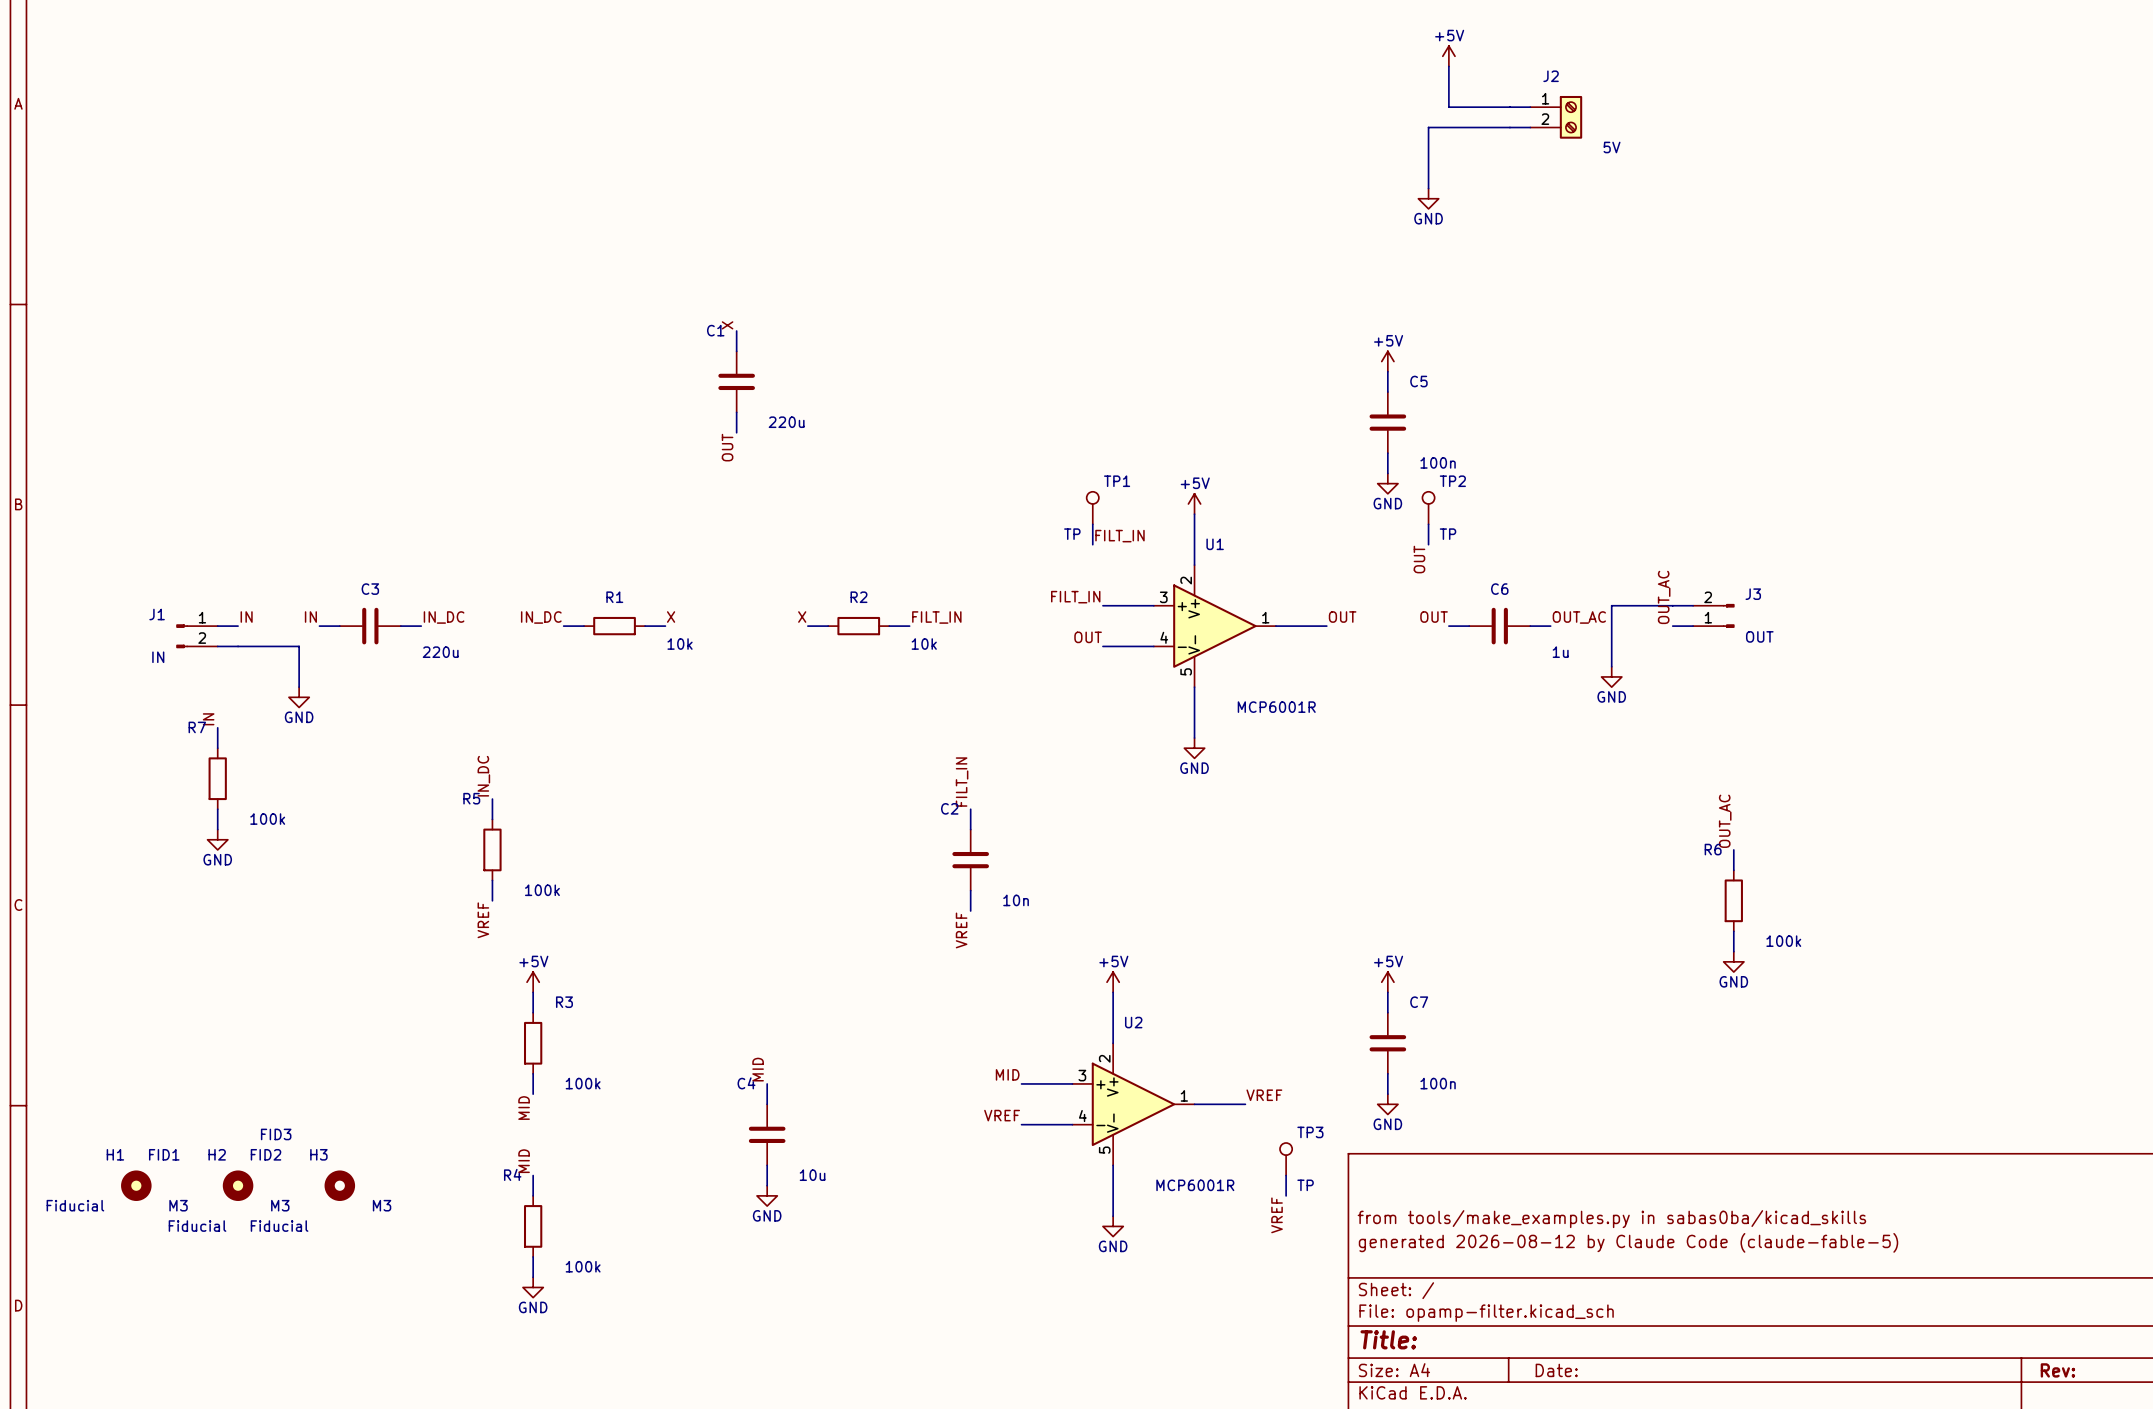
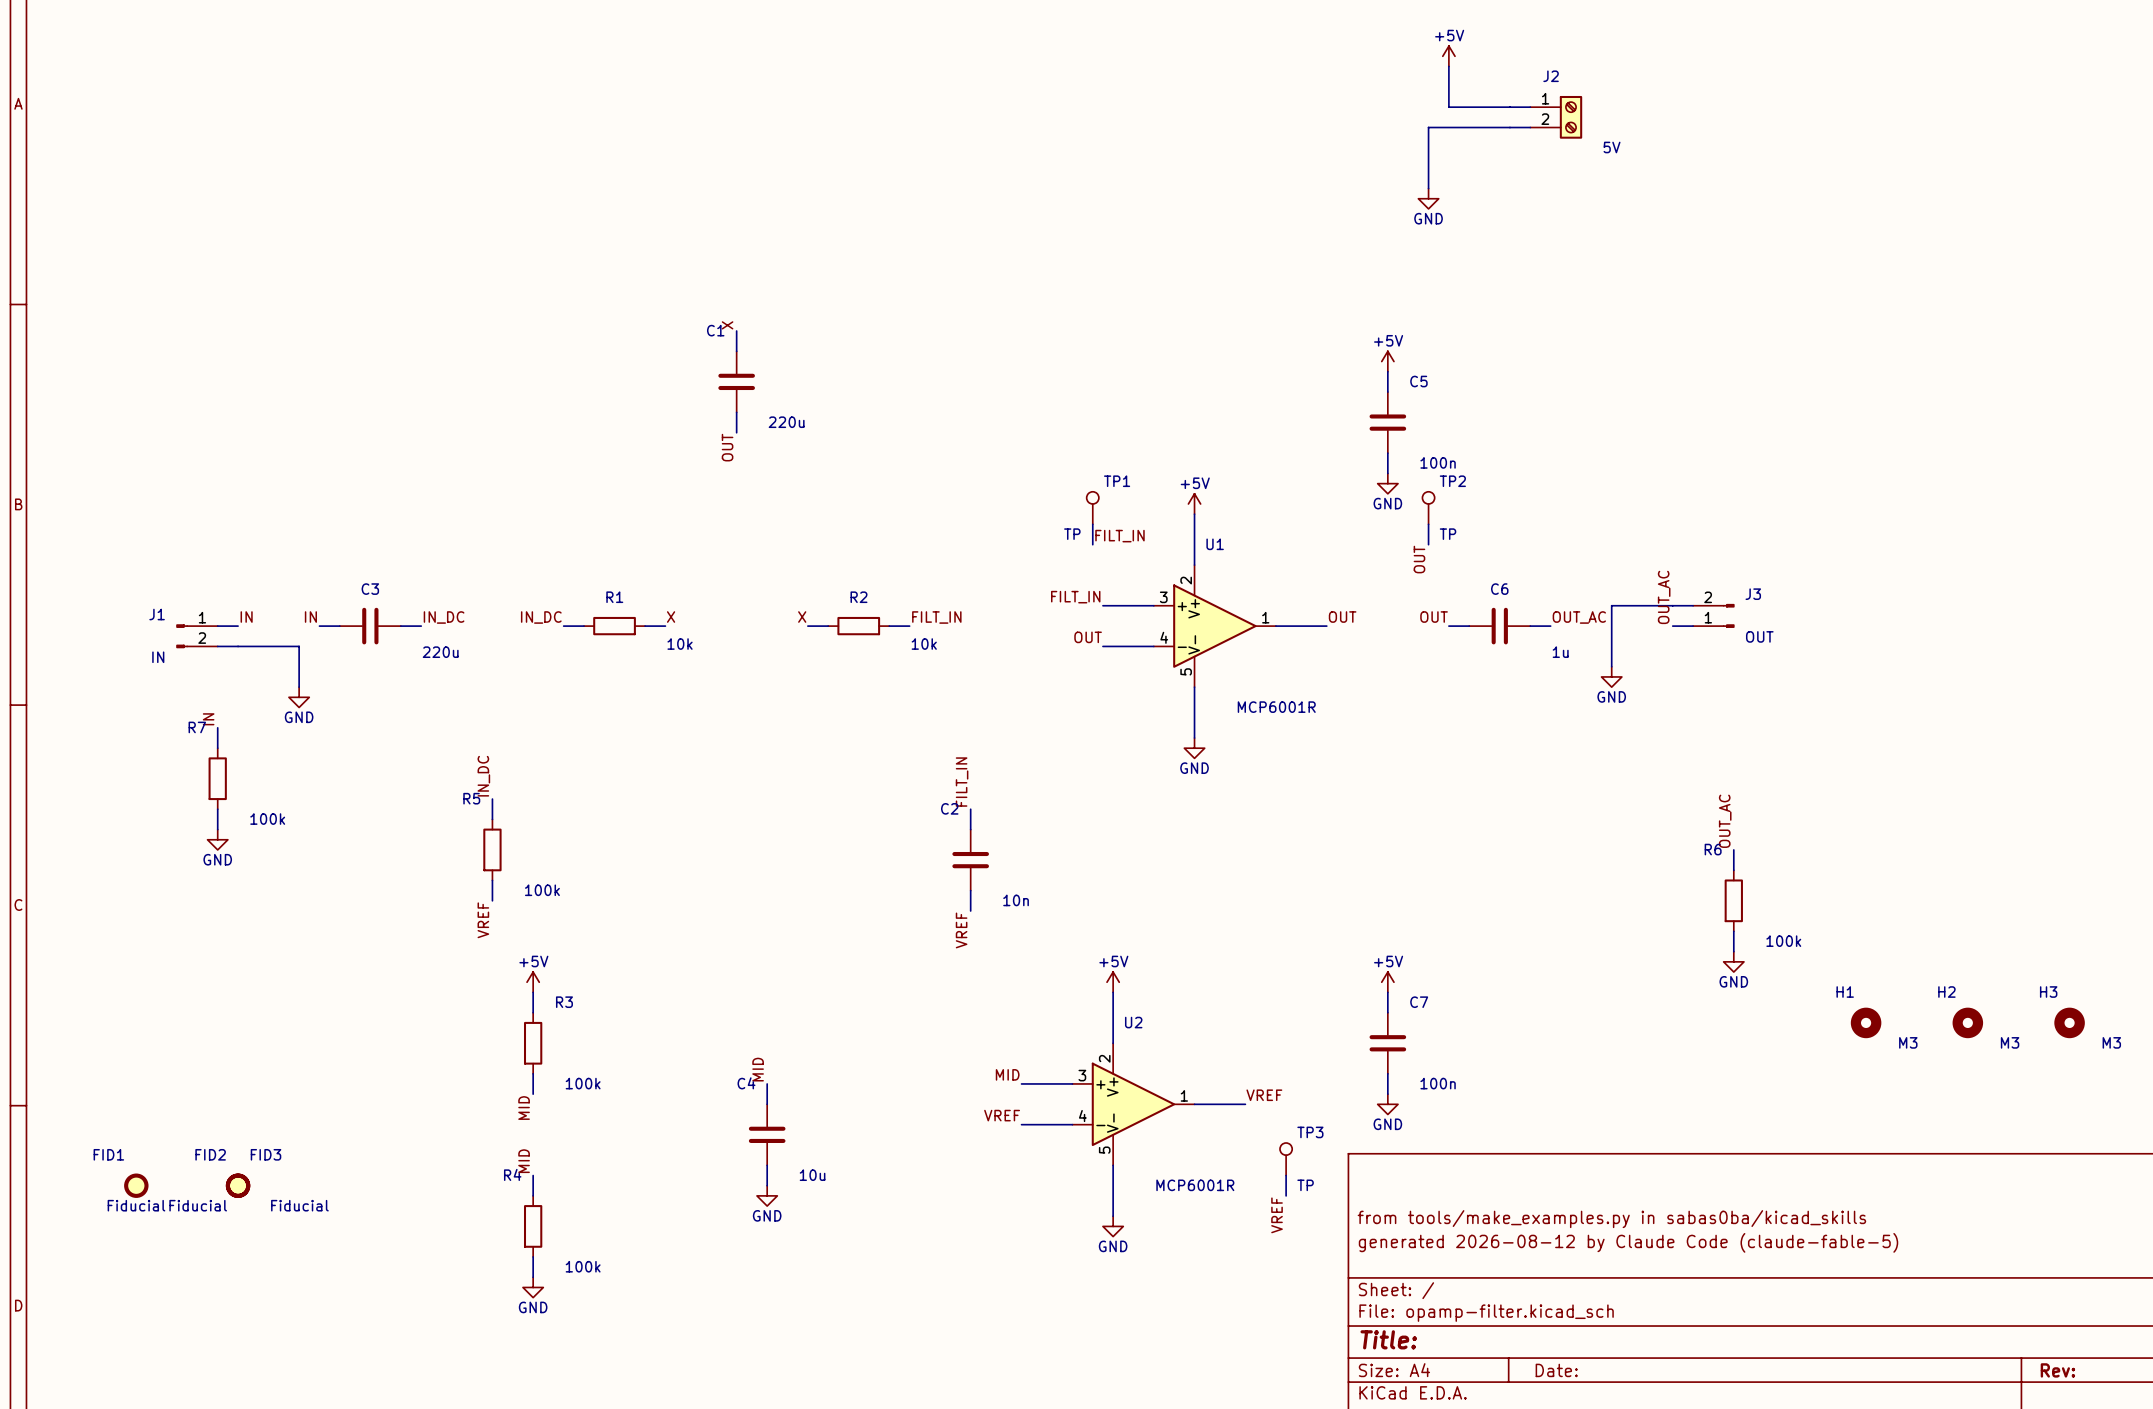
FID3 name position: FID3 (276, 1134) -> FID3 (266, 1154)
FID1 name position: FID1 (164, 1154) -> FID1 (108, 1154)
FID2 name position: FID2 (266, 1154) -> FID2 (210, 1154)
H1 position: (136, 1185) -> (1866, 1022)
H2 position: (238, 1185) -> (1967, 1022)
H3 position: (339, 1185) -> (2069, 1022)
FID1 value position: Fiducial (75, 1205) -> Fiducial (198, 1205)
FID3 value position: Fiducial (197, 1226) -> Fiducial (136, 1205)
FID2 value position: Fiducial (279, 1226) -> Fiducial (299, 1205)

